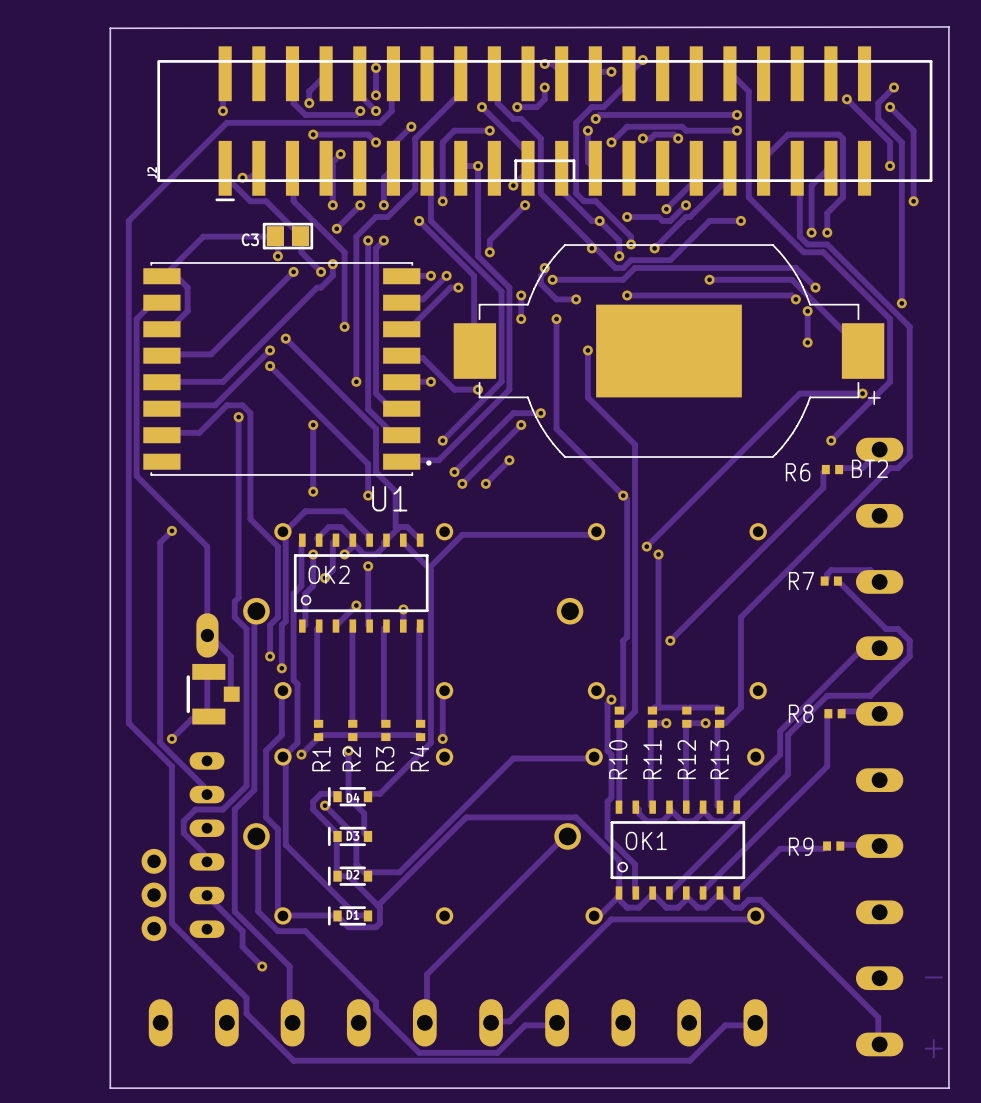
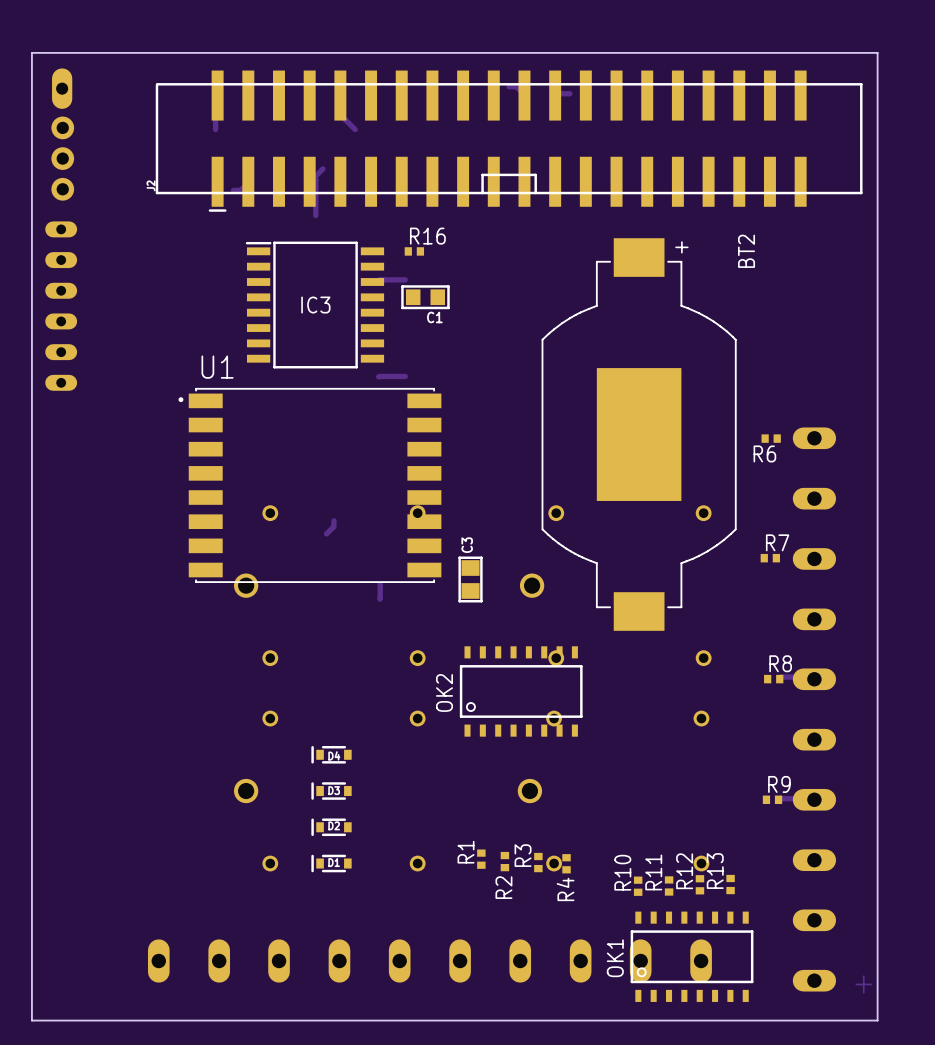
board edge: (948, 26) (110, 28) (110, 1088) -> (877, 52) (31, 52) (31, 1020) (112, 1020)
track: (642, 60) (627, 75) (627, 83) (603, 107) (591, 107) (576, 122) (576, 193) (583, 201) (595, 201) (631, 236) (631, 244) -> none
via: (642, 60) -> none
via: (544, 63) -> none
part: none -> (62, 88)
track: (376, 67) (376, 95) -> none
via: (376, 67) -> none
via: (611, 71) -> none
track: (292, 73) (293, 103) (305, 114) (356, 114) (360, 111) -> none
track: (326, 73) (309, 91) (309, 103) -> none
track: (393, 73) (391, 75) (391, 111) (379, 122) (226, 122) (128, 220) (128, 723) (171, 766) (171, 923) (246, 997) (246, 1013) (293, 1060) (689, 1060) (725, 1025) (752, 1025) (755, 1022) -> none
track: (460, 73) (458, 75) (458, 95) (415, 138) (415, 189) (387, 216) (376, 216) (356, 236) (356, 381) -> none
track: (494, 73) (497, 75) (497, 103) (513, 118) (521, 118) (540, 138) (540, 193) (615, 268) (623, 268) (631, 260) (670, 260) (709, 220) (740, 220) -> none
track: (729, 73) (748, 91) (748, 197) (803, 252) (823, 252) (890, 319) (890, 381) (831, 440) -> none
track: (544, 87) (544, 99) (536, 107) (517, 107) -> none
via: (544, 87) -> none
track: (894, 87) (878, 103) (878, 118) (901, 142) (901, 303) -> none
via: (894, 87) -> none
via: (376, 95) -> none
track: (846, 99) (890, 142) (890, 165) -> none
via: (846, 99) -> none
via: (309, 103) -> none
track: (481, 107) (525, 150) (525, 165) (529, 169) (513, 185) -> none
via: (481, 107) -> none
via: (517, 107) -> none
track: (890, 107) (913, 130) (913, 201) -> none
via: (890, 107) -> none
via: (222, 111) -> none
via: (360, 111) -> none
via: (376, 111) -> none
track: (737, 114) (599, 114) (595, 118) -> none
via: (737, 114) -> none
via: (595, 118) -> none
track: (411, 126) (395, 142) (395, 165) (383, 177) (383, 205) -> none
via: (411, 126) -> none
track: (489, 130) (454, 130) (442, 142) (442, 201) -> none
via: (489, 130) -> none
track: (587, 130) (587, 162) (595, 168) -> none
via: (587, 130) -> none
track: (737, 130) (686, 130) (682, 126) (627, 126) (611, 142) -> none
via: (737, 130) -> none
track: (313, 134) (368, 134) (376, 142) -> none
via: (313, 134) -> none
via: (642, 138) -> none
track: (678, 138) (674, 134) (654, 134) (650, 138) (642, 138) -> none
via: (678, 138) -> none
part: none -> (62, 158)
via: (376, 142) -> none
via: (611, 142) -> none
via: (340, 154) -> none
via: (478, 165) -> none
via: (890, 165) -> none
track: (225, 168) (226, 177) (250, 201) (266, 201) (301, 236) (301, 252) (321, 271) -> none
track: (292, 168) (293, 201) (344, 252) (344, 326) -> none
track: (427, 168) (430, 169) (430, 220) (501, 291) (501, 381) (442, 440) -> none
track: (460, 168) (462, 165) (478, 165) (478, 256) (509, 287) (509, 389) (438, 460) (401, 461) -> none
track: (561, 168) (564, 169) (564, 193) (591, 220) (599, 220) (619, 240) (619, 256) -> none
track: (696, 168) (693, 169) (693, 181) (666, 209) -> none
track: (729, 168) (729, 177) (654, 248) -> none
track: (763, 168) (764, 158) (788, 134) (839, 134) (842, 138) (842, 197) (827, 213) (827, 232) -> none
track: (797, 168) (799, 169) (799, 236) (807, 244) (827, 244) (909, 326) (909, 456) (897, 468) (890, 468) (740, 617) (740, 707) (725, 723) (719, 723) (717, 727) (717, 805) (719, 807) -> none
track: (830, 168) (811, 185) (811, 232) -> none
via: (242, 177) -> none
via: (513, 185) -> none
via: (442, 201) -> none
via: (913, 201) -> none
via: (332, 205) -> none
track: (360, 205) (336, 228) -> none
via: (360, 205) -> none
via: (383, 205) -> none
track: (525, 205) (489, 240) (489, 252) -> none
via: (525, 205) -> none
track: (686, 205) (670, 220) (662, 220) (658, 216) (627, 216) -> none
via: (686, 205) -> none
via: (666, 209) -> none
via: (627, 216) -> none
track: (419, 220) (474, 275) (474, 351) -> none
via: (419, 220) -> none
via: (599, 220) -> none
via: (740, 220) -> none
via: (336, 228) -> none
via: (811, 232) -> none
via: (827, 232) -> none
C3 rotation: 0° (287, 236) -> 90° clockwise (470, 579)
C3 position: (287, 236) -> (470, 579)
track: (368, 240) (368, 409) (391, 432) (399, 432) (401, 435) -> none
via: (368, 240) -> none
track: (383, 240) (376, 248) (376, 393) (387, 405) (399, 405) (401, 408) -> none
via: (383, 240) -> none
R16: none -> (414, 251)
via: (631, 244) -> none
via: (591, 248) -> none
via: (654, 248) -> none
via: (489, 252) -> none
track: (277, 256) (277, 236) (203, 236) (161, 276) (171, 271) (187, 287) (187, 311) (171, 326) (164, 326) (161, 329) -> none
via: (277, 256) -> none
via: (619, 256) -> none
track: (332, 264) (332, 275) (321, 287) (317, 287) (222, 381) (161, 382) -> none
via: (332, 264) -> none
track: (544, 268) (544, 271) (540, 275) (540, 283) (556, 299) (576, 299) -> none
via: (544, 268) -> none
track: (293, 271) (211, 354) (161, 355) -> none
via: (293, 271) -> none
via: (321, 271) -> none
via: (430, 275) -> none
track: (446, 275) (423, 299) (403, 299) (401, 302) -> none
via: (446, 275) -> none
track: (552, 279) (623, 279) (635, 268) (795, 268) (815, 287) -> none
via: (552, 279) -> none
track: (709, 279) (791, 279) (863, 351) -> none
via: (709, 279) -> none
track: (458, 287) (450, 287) (411, 326) (403, 326) (401, 329) -> none
via: (458, 287) -> none
via: (815, 287) -> none
C1: none -> (425, 297)
track: (521, 295) (521, 319) -> none
via: (521, 295) -> none
track: (627, 295) (791, 295) (795, 299) -> none
via: (627, 295) -> none
via: (576, 299) -> none
via: (795, 299) -> none
track: (161, 302) (152, 303) (136, 319) (136, 475) (207, 546) (207, 635) (230, 656) (231, 694) -> none
IC3: none -> (314, 305)
via: (901, 303) -> none
part: none -> (61, 306)
track: (807, 311) (807, 342) -> none
via: (807, 311) -> none
via: (521, 319) -> none
track: (556, 319) (556, 428) (627, 499) (627, 636) (623, 640) (623, 707) (619, 710) -> none
via: (556, 319) -> none
via: (344, 326) -> none
track: (285, 338) (376, 428) (376, 472) (395, 491) (395, 527) (397, 528) -> none
via: (285, 338) -> none
via: (807, 342) -> none
track: (270, 350) (215, 405) (164, 405) (161, 408) -> none
via: (270, 350) -> none
track: (587, 350) (587, 397) (635, 444) (635, 711) (623, 723) (619, 723) (618, 807) -> none
via: (587, 350) -> none
BT2 rotation: 0° (669, 351) -> 90° counterclockwise (639, 434)
track: (401, 355) (403, 358) (423, 358) (454, 389) (478, 389) -> none
track: (270, 366) (368, 464) (368, 495) -> none
via: (270, 366) -> none
U1 rotation: 0° (287, 368) -> 180° (309, 485)
via: (356, 381) -> none
via: (430, 381) -> none
via: (478, 389) -> none
track: (862, 393) (799, 393) (646, 546) -> none
via: (862, 393) -> none
track: (540, 413) (513, 413) (454, 472) -> none
via: (540, 413) -> none
track: (238, 417) (238, 597) (234, 601) (234, 617) (246, 629) (246, 786) (222, 809) (195, 809) (183, 821) (183, 833) (203, 852) (203, 860) (207, 861) -> none
via: (238, 417) -> none
track: (313, 424) (313, 491) -> none
via: (313, 424) -> none
track: (521, 424) (462, 483) -> none
via: (521, 424) -> none
track: (161, 435) (164, 432) (199, 432) (226, 405) (242, 405) (250, 413) (250, 519) (277, 546) (277, 617) (270, 625) (270, 656) -> none
via: (442, 440) -> none
via: (831, 440) -> none
track: (879, 449) (862, 468) (839, 469) -> none
track: (509, 460) (485, 483) -> none
via: (509, 460) -> none
track: (825, 469) (823, 472) (823, 487) (670, 640) -> none
R6 position: (832, 469) -> (771, 438)
via: (454, 472) -> none
R6 name position: R6 (798, 472) -> R6 (764, 453)
via: (462, 483) -> none
via: (485, 483) -> none
via: (313, 491) -> none
via: (368, 495) -> none
via: (623, 495) -> none
track: (171, 530) (160, 542) (160, 742) (203, 786) (203, 793) (207, 794) -> none
via: (171, 530) -> none
track: (596, 531) (595, 534) (462, 534) (428, 568) -> none
track: (302, 540) (301, 585) (293, 593) (293, 680) (297, 683) (297, 742) (282, 756) (285, 758) (285, 844) (356, 915) (367, 915) -> none
track: (336, 540) (332, 542) (332, 570) (324, 578) -> none
track: (369, 540) (368, 534) (344, 511) (305, 511) (282, 531) (285, 534) (285, 621) (281, 625) (281, 668) -> none
track: (403, 540) (403, 542) (430, 570) (430, 742) (379, 793) (368, 793) (367, 796) -> none
track: (420, 540) (407, 527) (399, 527) (383, 542) (383, 546) (376, 554) (364, 554) (340, 527) (328, 527) (317, 538) (319, 540) -> none
via: (646, 546) -> none
track: (313, 554) (313, 585) (305, 593) (305, 625) (302, 626) -> none
via: (313, 554) -> none
via: (344, 554) -> none
track: (658, 554) (658, 707) -> none
via: (658, 554) -> none
track: (368, 566) (369, 626) -> none
via: (368, 566) -> none
OK2 name rotation: 0° (329, 574) -> 90° counterclockwise (444, 692)
OK2 name position: OK2 (329, 574) -> OK2 (444, 692)
via: (324, 578) -> none
R7 name position: R7 (801, 581) -> R7 (777, 542)
track: (824, 581) (831, 570) (870, 570) (879, 581) -> none
track: (837, 581) (886, 629) (897, 629) (909, 640) (909, 656) (870, 695) (827, 695) (788, 734) (788, 774) (669, 893) -> none
OK2 position: (361, 583) -> (521, 691)
track: (356, 605) (336, 626) -> none
via: (356, 605) -> none
via: (403, 609) -> none
track: (256, 611) (254, 613) (254, 789) (234, 809) (234, 911) (289, 966) (289, 1021) (292, 1022) -> none
track: (319, 626) (317, 629) (318, 723) -> none
track: (352, 626) (352, 723) -> none
track: (386, 626) (383, 629) (383, 723) (385, 723) -> none
track: (420, 626) (420, 723) -> none
part: (207, 635) -> none
via: (670, 640) -> none
track: (879, 648) (862, 648) (780, 731) (780, 754) (737, 797) (737, 809) (725, 821) (713, 821) (701, 809) (703, 807) (701, 813) (693, 821) (682, 821) (669, 807) (670, 813) (662, 821) (646, 821) (635, 807) -> none
via: (270, 656) -> none
via: (281, 668) -> none
track: (208, 671) (207, 672) (207, 715) (208, 716) (207, 719) (191, 719) (171, 738) -> none
track: (282, 690) (281, 734) (266, 750) (266, 817) (277, 829) (277, 911) (282, 915) (336, 915) (348, 927) (376, 927) (379, 923) (379, 907) (348, 876) (337, 876) (336, 833) (313, 809) (313, 801) (321, 793) (336, 793) (337, 796) -> none
track: (444, 690) (442, 691) (442, 738) -> none
part: (213, 694) -> none
track: (611, 699) (607, 703) (607, 750) (611, 754) (611, 797) (607, 801) (607, 837) (635, 864) (635, 893) -> none
via: (611, 699) -> none
track: (719, 710) (717, 707) (689, 707) (686, 710) (686, 707) (654, 707) (652, 710) -> none
R8 name position: R8 (801, 713) -> R8 (780, 663)
track: (828, 713) (827, 766) (701, 891) (703, 893) -> none
R10 position: (619, 717) -> (638, 886)
R11 position: (652, 717) -> (669, 885)
R12 position: (686, 717) -> (699, 884)
R13 position: (719, 717) -> (730, 884)
track: (666, 723) (654, 723) (650, 727) (650, 805) (652, 807) -> none
via: (666, 723) -> none
track: (705, 723) (686, 723) (686, 727) (686, 807) -> none
via: (705, 723) -> none
R1 position: (318, 730) -> (481, 859)
R2 position: (352, 730) -> (504, 861)
R3 position: (385, 730) -> (538, 862)
R4 position: (420, 730) -> (566, 863)
track: (420, 737) (419, 734) (387, 734) (385, 737) (383, 734) (356, 734) (352, 737) (352, 734) (321, 734) (301, 754) -> none
via: (171, 738) -> none
via: (442, 738) -> none
track: (348, 750) (348, 797) (364, 813) (364, 833) (367, 836) -> none
via: (348, 750) -> none
via: (301, 754) -> none
track: (594, 756) (591, 758) (513, 758) (399, 872) (368, 872) (367, 876) (356, 864) (356, 837) (324, 805) -> none
R1 name position: R1 (321, 759) -> R1 (466, 852)
R3 name position: R3 (385, 759) -> R3 (523, 855)
R10 name position: R10 (618, 759) -> R10 (622, 872)
R11 name position: R11 (652, 759) -> R11 (653, 872)
R12 name position: R12 (686, 759) -> R12 (684, 871)
R13 name position: R13 (719, 759) -> R13 (715, 871)
via: (324, 805) -> none
track: (256, 836) (258, 837) (258, 911) (277, 931) (305, 931) (376, 1001) (376, 1009) (419, 1052) (497, 1052) (525, 1025) (556, 1025) (557, 1022) -> none
track: (567, 836) (564, 837) (427, 974) (427, 1021) (424, 1022) -> none
OK1 name rotation: 0° (646, 840) -> 90° counterclockwise (615, 958)
OK1 name position: OK1 (646, 840) -> OK1 (615, 958)
part: (207, 845) -> none
R9 name position: R9 (801, 846) -> R9 (779, 784)
track: (827, 846) (823, 848) (780, 848) (736, 893) -> none
OK1 position: (677, 850) -> (692, 956)
track: (686, 893) (686, 895) (697, 907) (705, 907) (719, 893) (733, 907) (740, 907) (748, 899) (760, 899) (878, 1017) (879, 1044) -> none
part: (154, 895) -> none
track: (207, 895) (242, 931) (242, 946) (262, 966) -> none
track: (687, 897) (678, 907) (666, 907) (652, 893) (638, 907) (627, 907) (617, 897) -> none
track: (377, 905) (466, 817) (576, 817) (619, 860) (619, 895) (595, 919) (594, 915) -> none
track: (755, 915) (752, 919) (611, 919) (509, 1021) (491, 1022) -> none
via: (262, 966) -> none
text: - (933, 977) -> none

